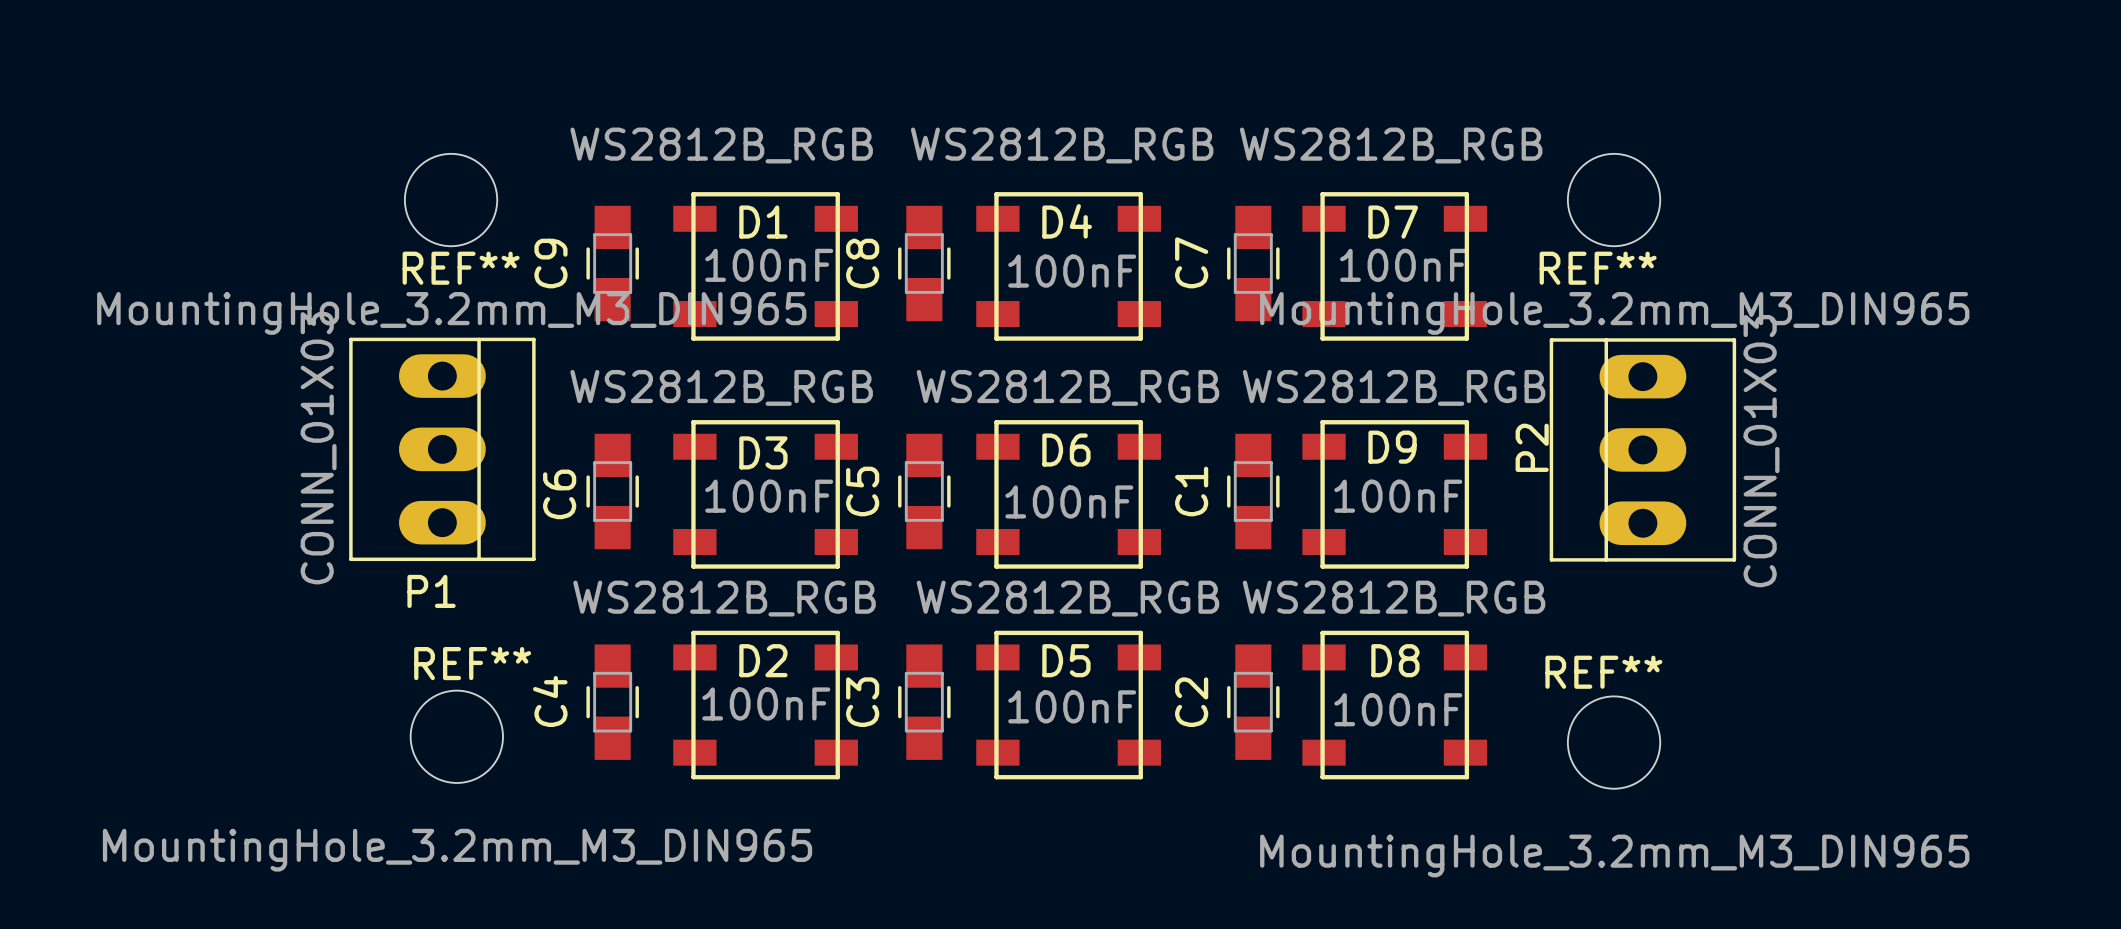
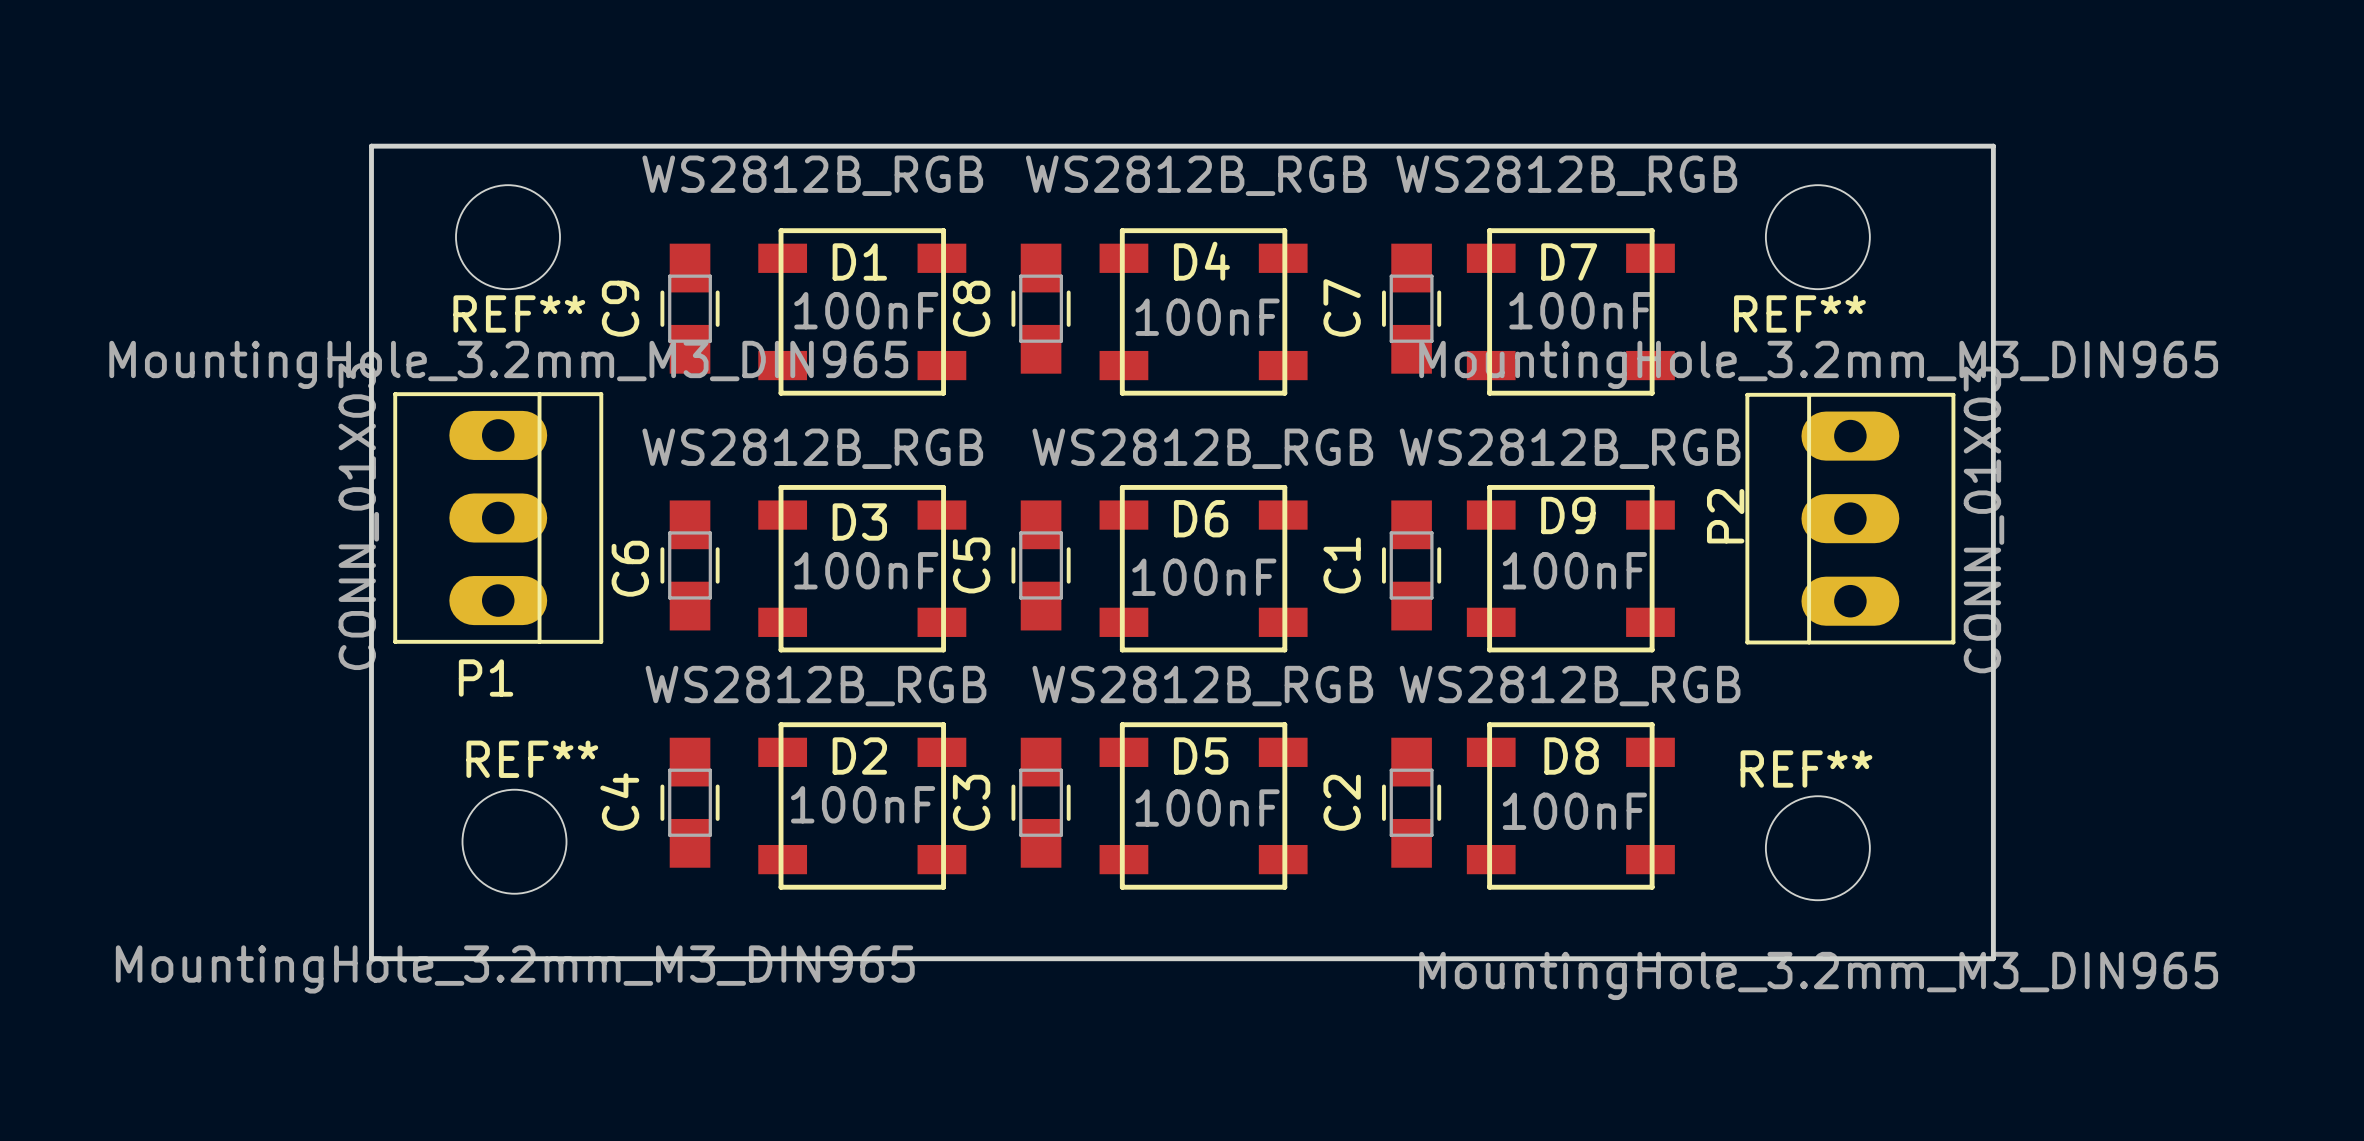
board edge: none -> (371, 146) (1993, 146) (1993, 958) (371, 958) (371, 146)

